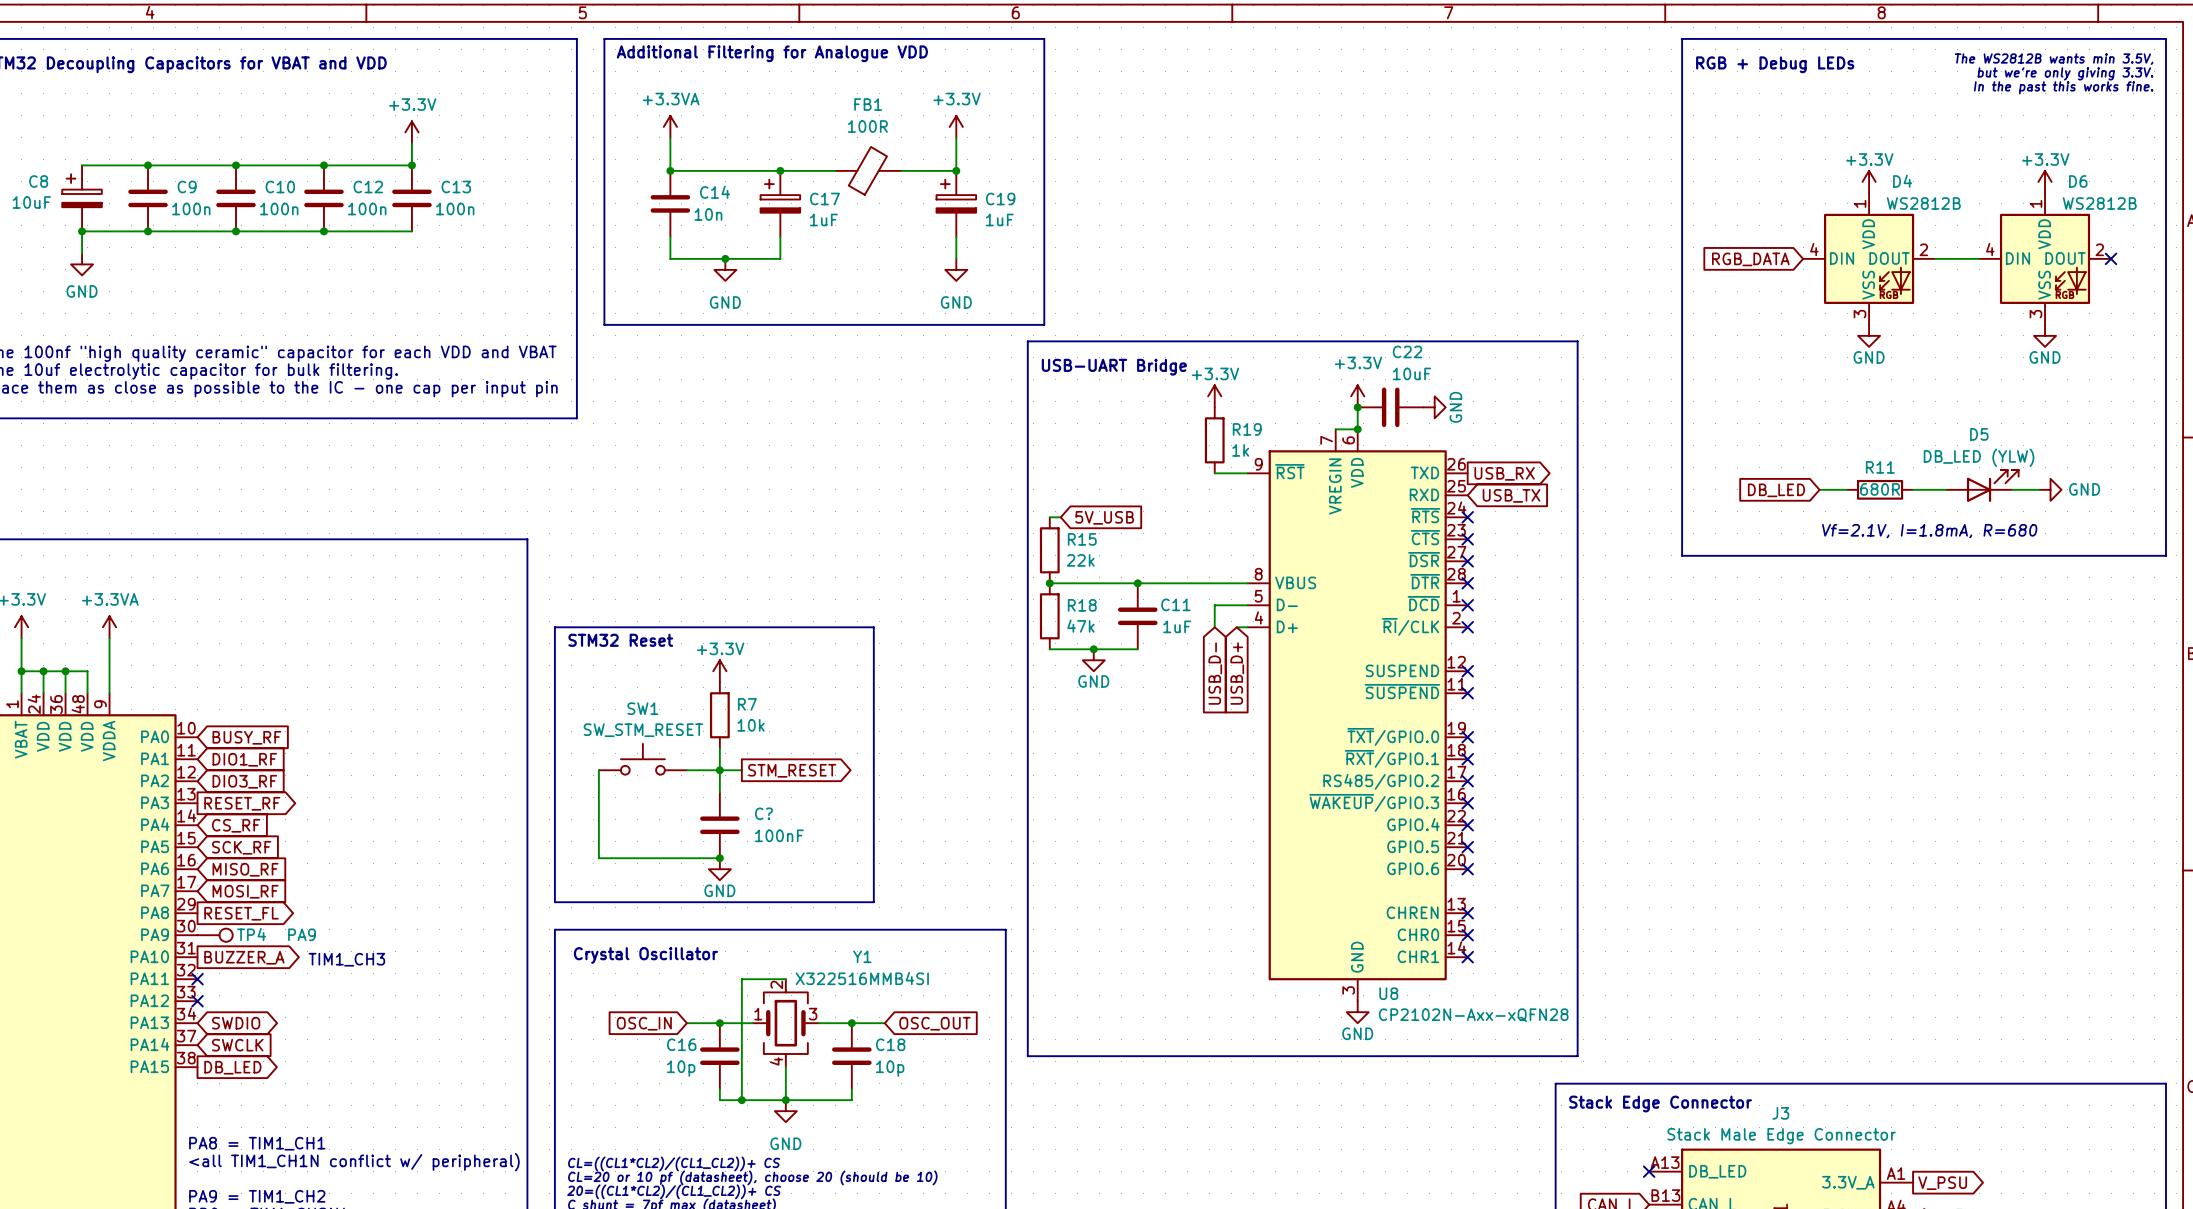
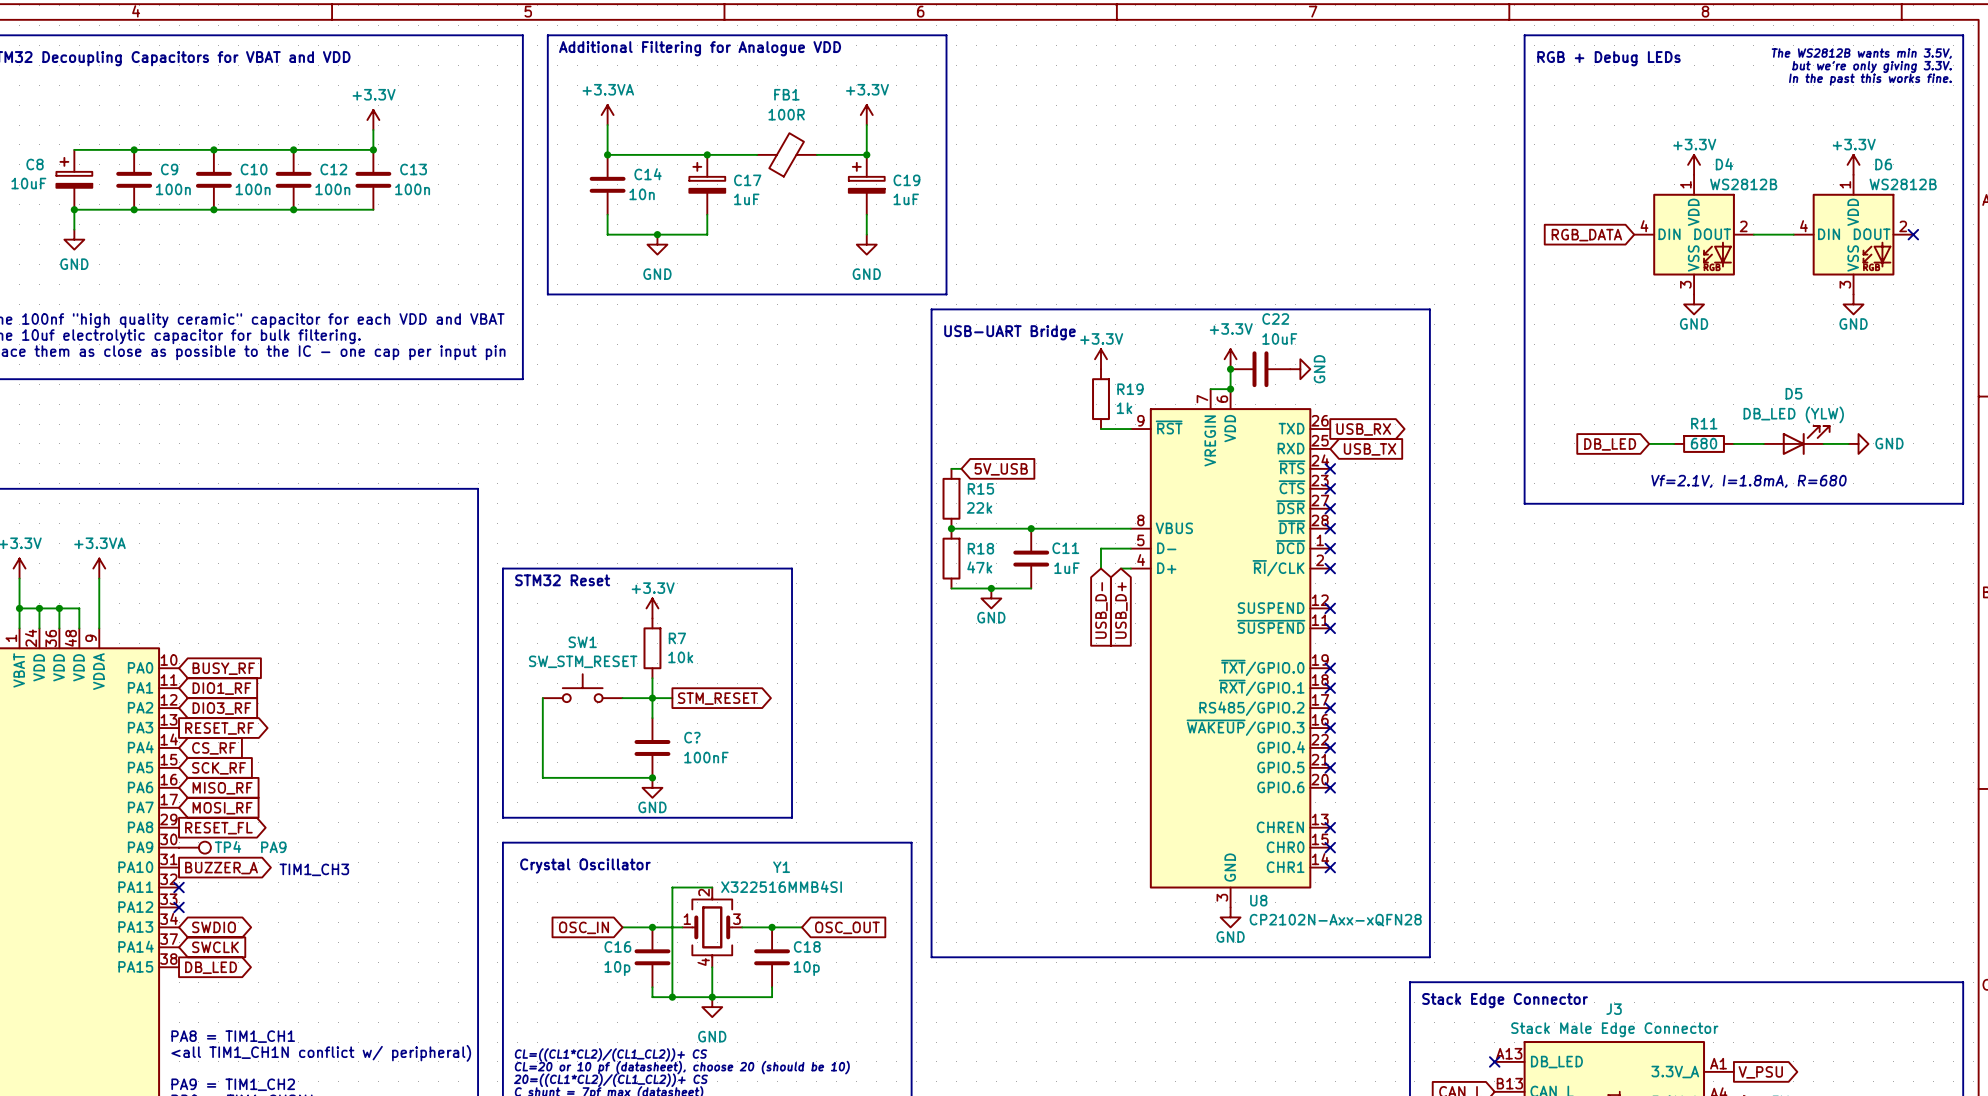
R11 value: 680R (1880, 489) -> 680 (1704, 443)

